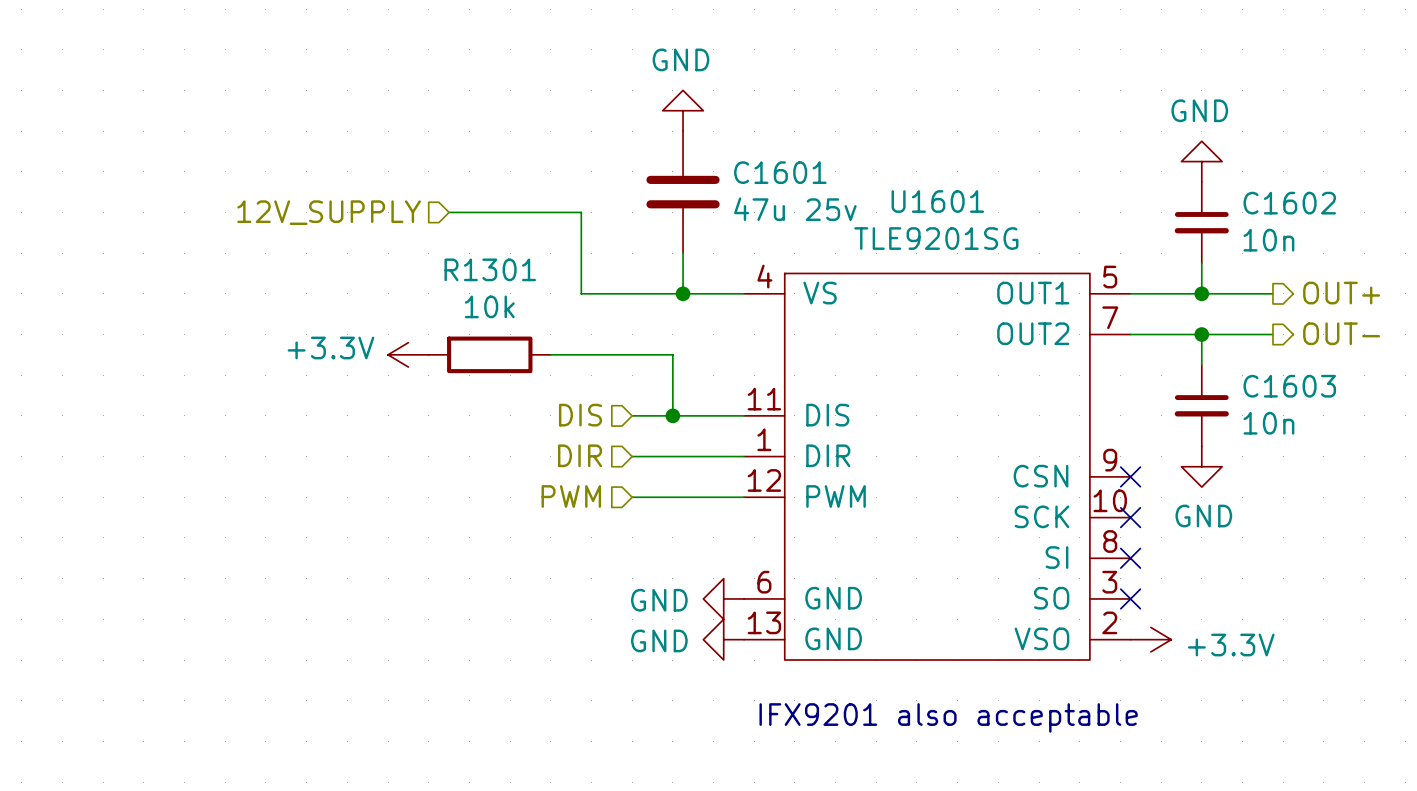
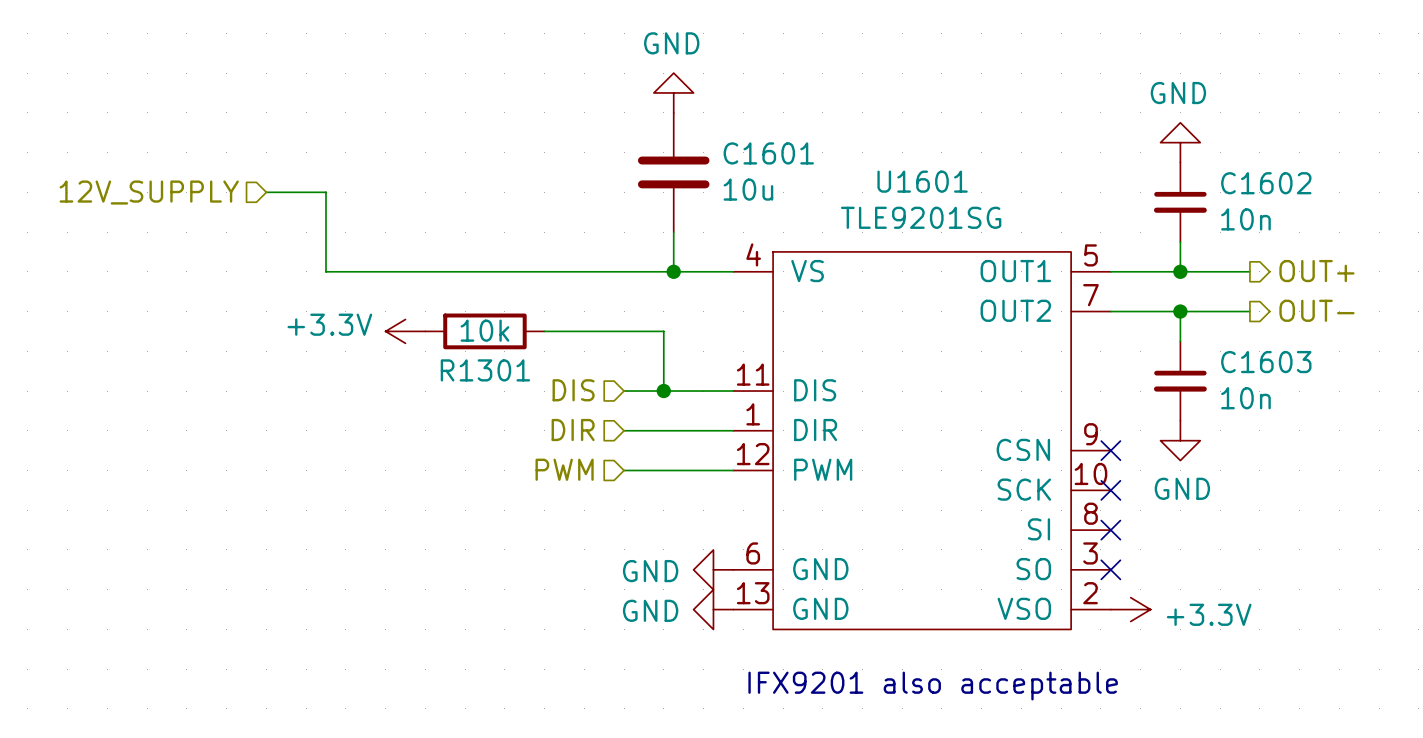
C1601 value: 47u 25v (795, 209) -> 10u (748, 189)
hierarchical label position: 12V_SUPPLY (329, 212) -> 12V_SUPPLY (149, 192)
wire: (449, 212) (581, 212) (581, 293) -> (266, 192) (326, 192) (326, 271) (574, 271)
R1301 name position: R1301 (490, 269) -> R1301 (485, 370)
R1301 value position: 10k (489, 306) -> 10k (484, 330)

